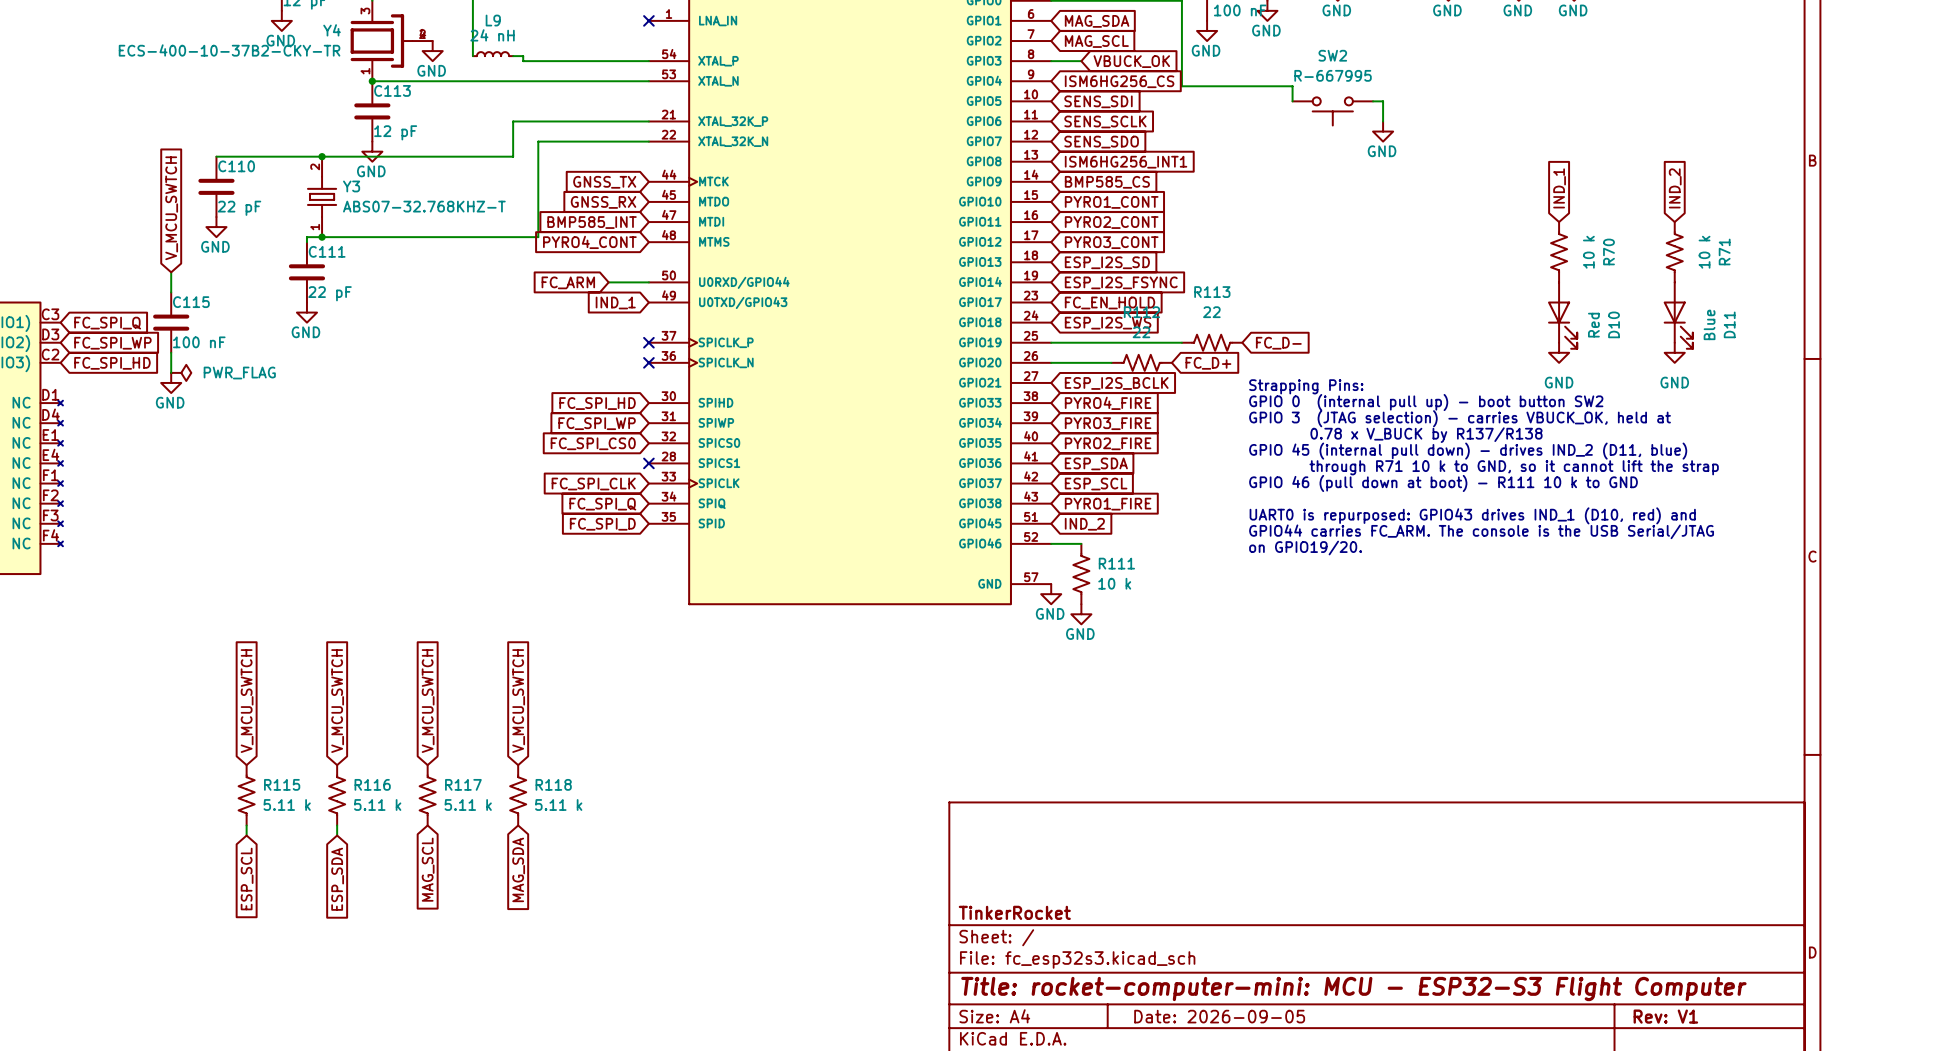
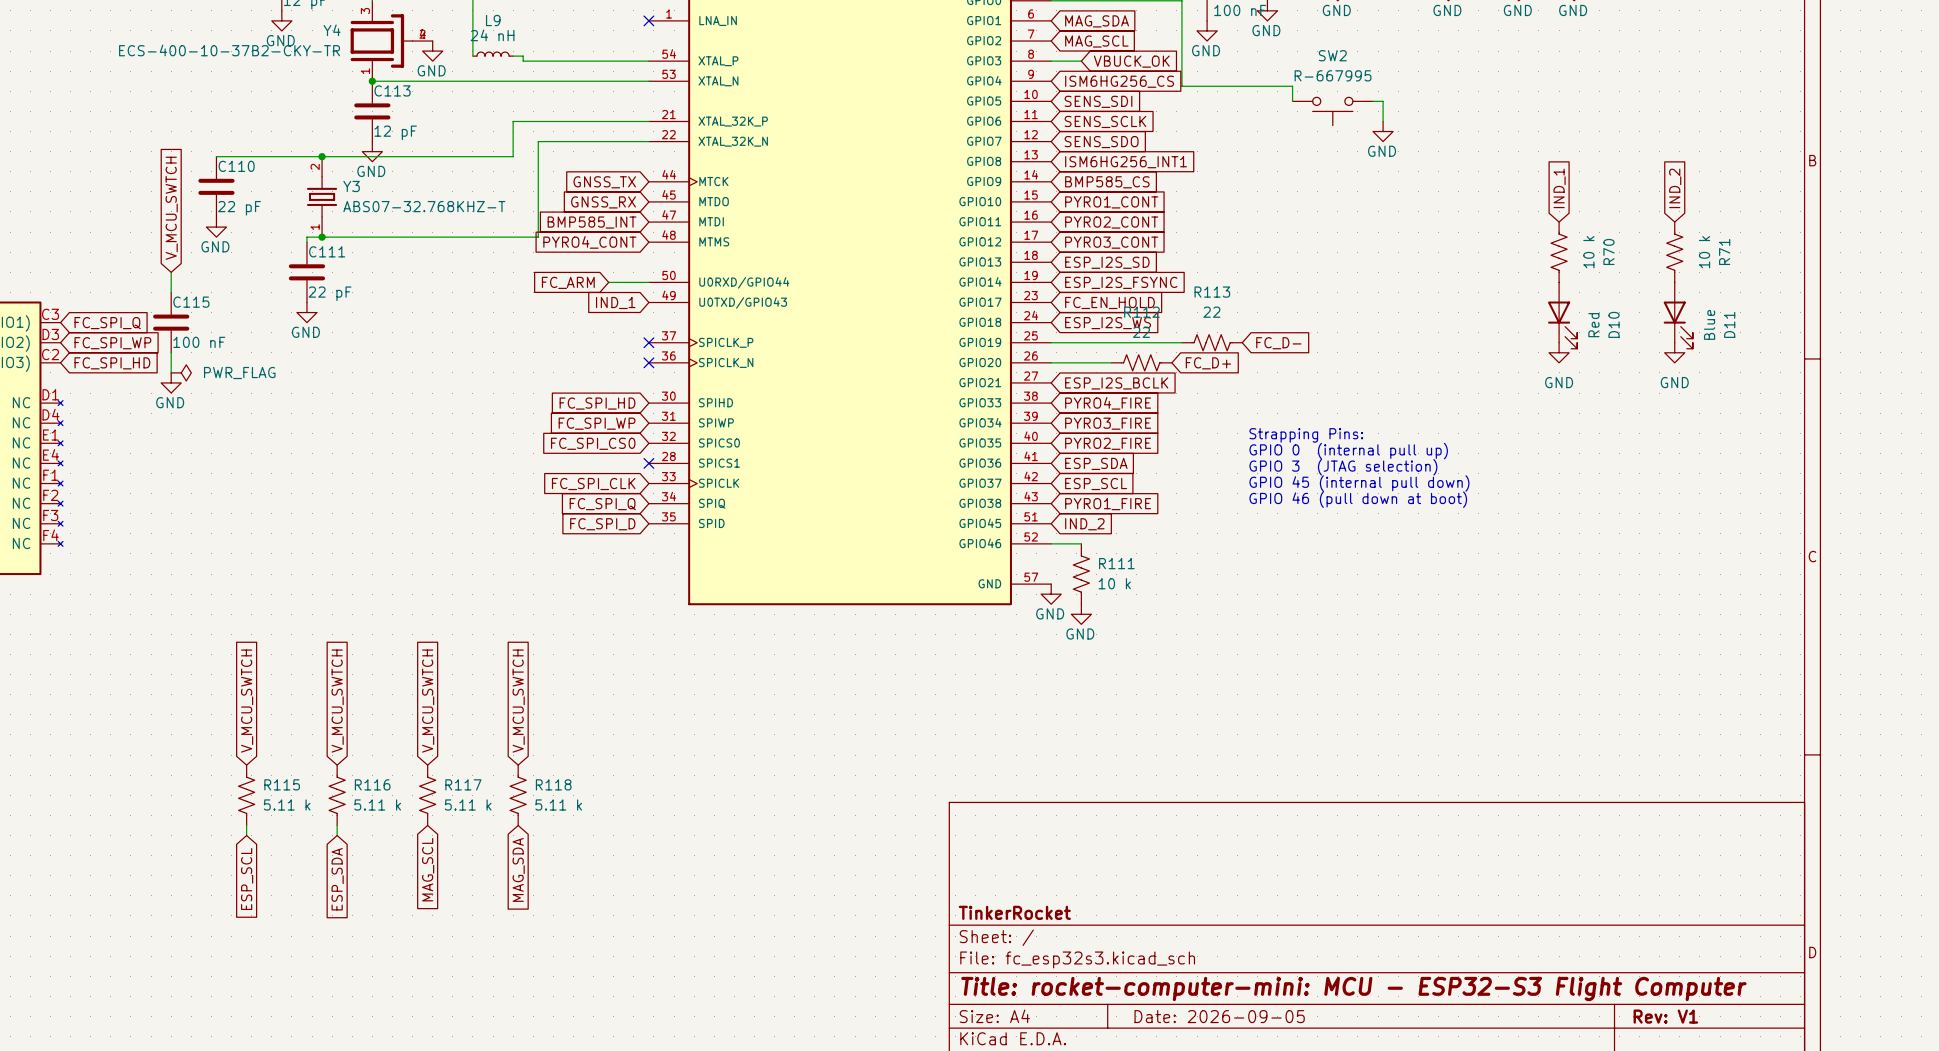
text: Strapping Pins: (1306, 386) -> none
text: GPIO 0 (internal pull up) - boot button SW2 (1426, 402) -> none
text: GPIO 3 (JTAG selection) - carries VBUCK_OK, held at (1460, 418) -> none
text: 0.78 x V_BUCK by R137/R138 (1426, 435) -> Strapping Pins: (1306, 435)
text: GPIO 45 (internal pull down) - drives IND_2 (D11, blue) (1468, 451) -> GPIO 0 (internal pull up) (1348, 451)
text: through R71 10 k to GND, so it cannot lift the strap (1514, 467) -> GPIO 3 (JTAG selection) (1343, 467)
text: GPIO 46 (pull down at boot) - R111 10 k to GND (1443, 483) -> GPIO 45 (internal pull down) (1359, 483)
text: none -> GPIO 46 (pull down at boot) (1358, 499)
text: UART0 is repurposed: GPIO43 drives IND_1 (D10, red) and (1472, 515) -> none
text: GPIO44 carries FC_ARM. The console is the USB Serial/JTAG (1481, 531) -> none
text: on GPIO19/20. (1305, 548) -> none

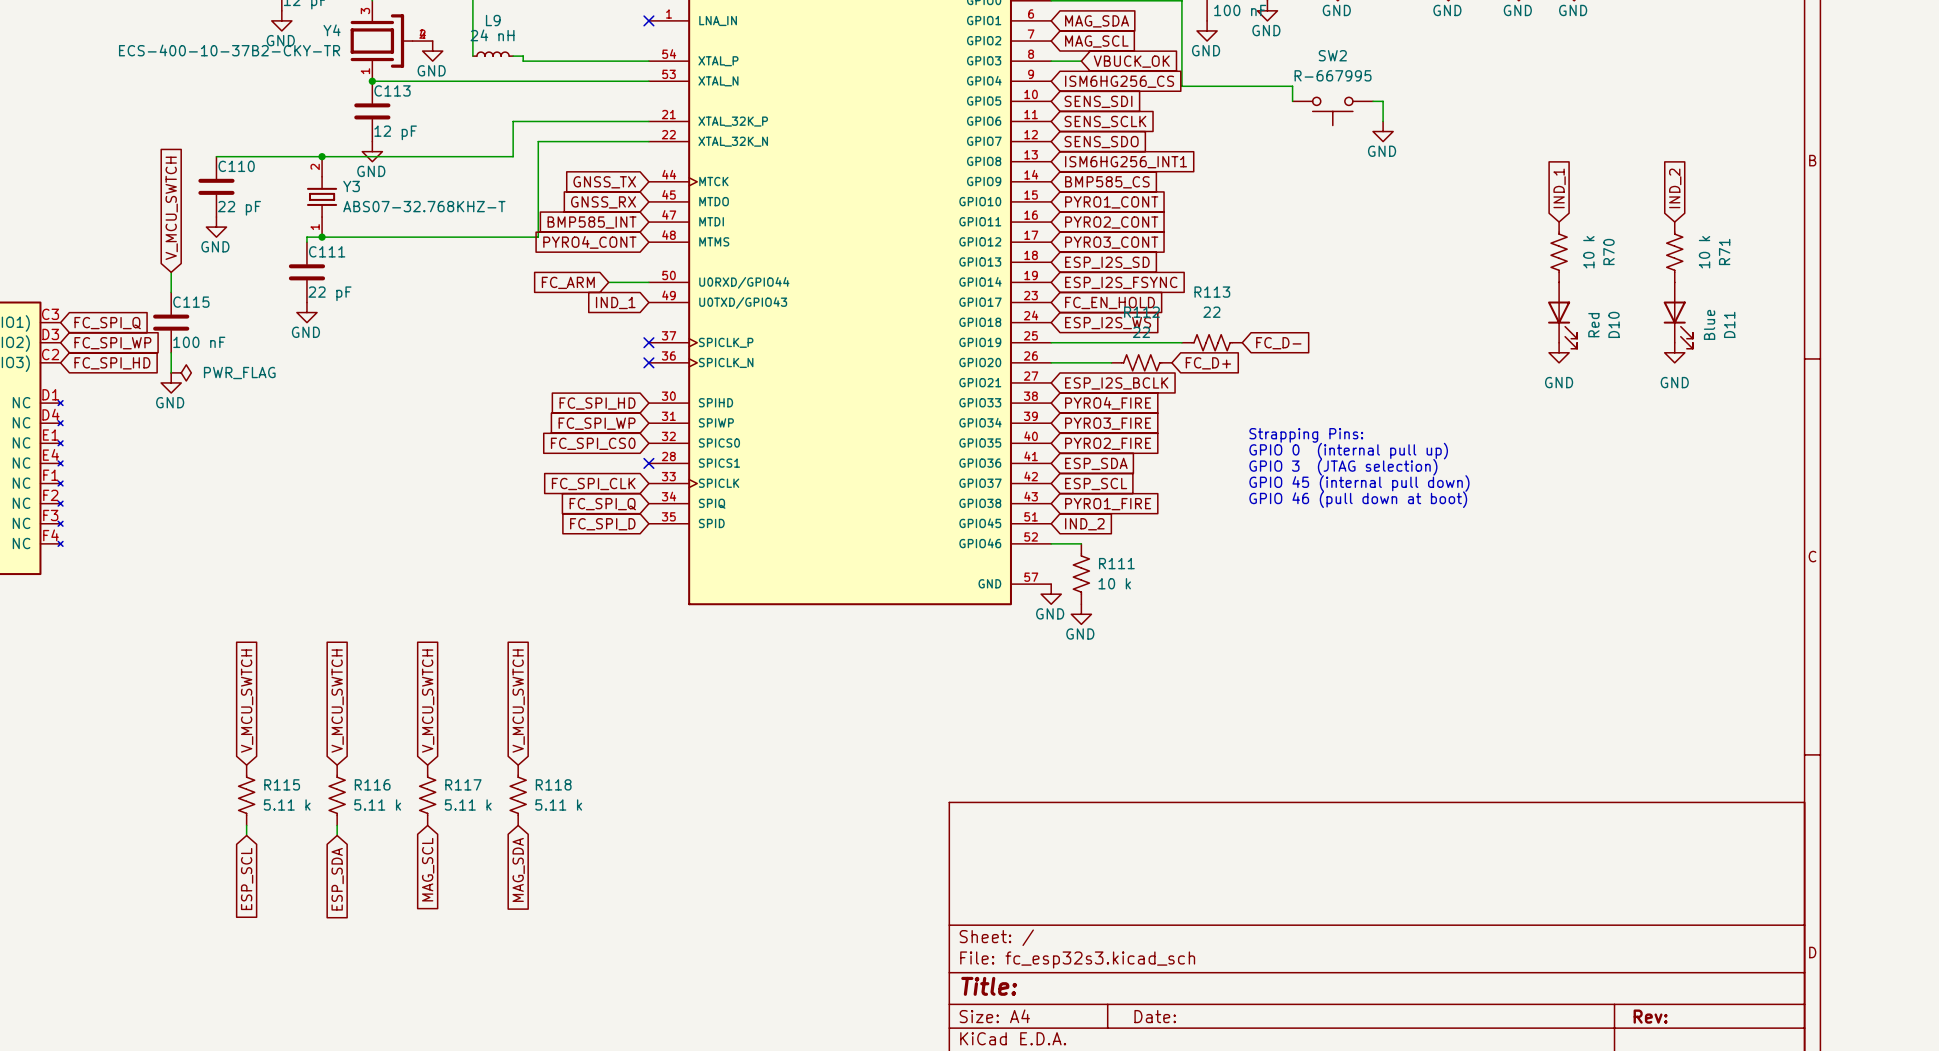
title block: TinkerRocket (1014, 912) -> none
title block: Title: rocket-computer-mini: MCU - ESP32-S3 Flight Computer (1353, 988) -> Title: (989, 986)
title block: Date: 2026-09-05 (1219, 1016) -> Date: (1155, 1016)
title block: Rev: V1 (1665, 1016) -> Rev: (1650, 1016)

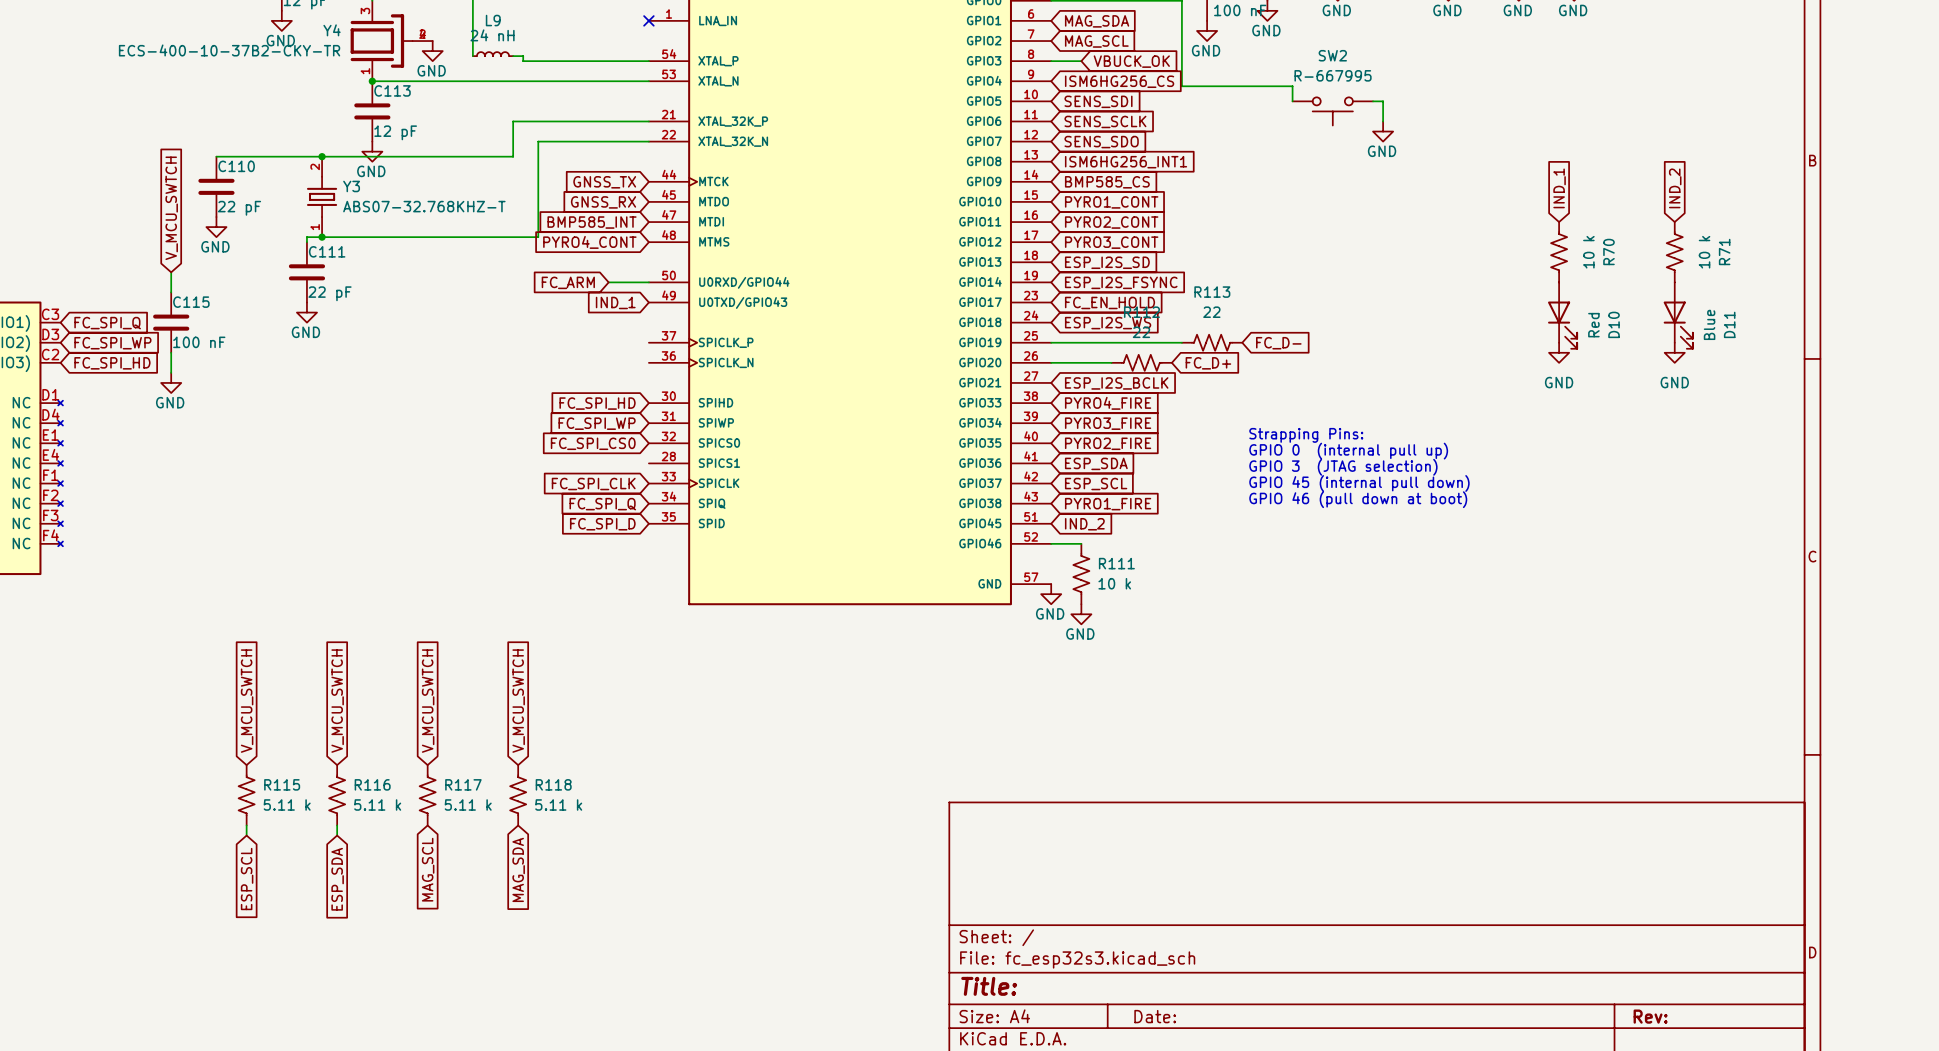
no-connect mark: (648, 342) -> none
no-connect mark: (648, 362) -> none
power symbol: PWR_FLAG (181, 372) -> none
no-connect mark: (648, 463) -> none

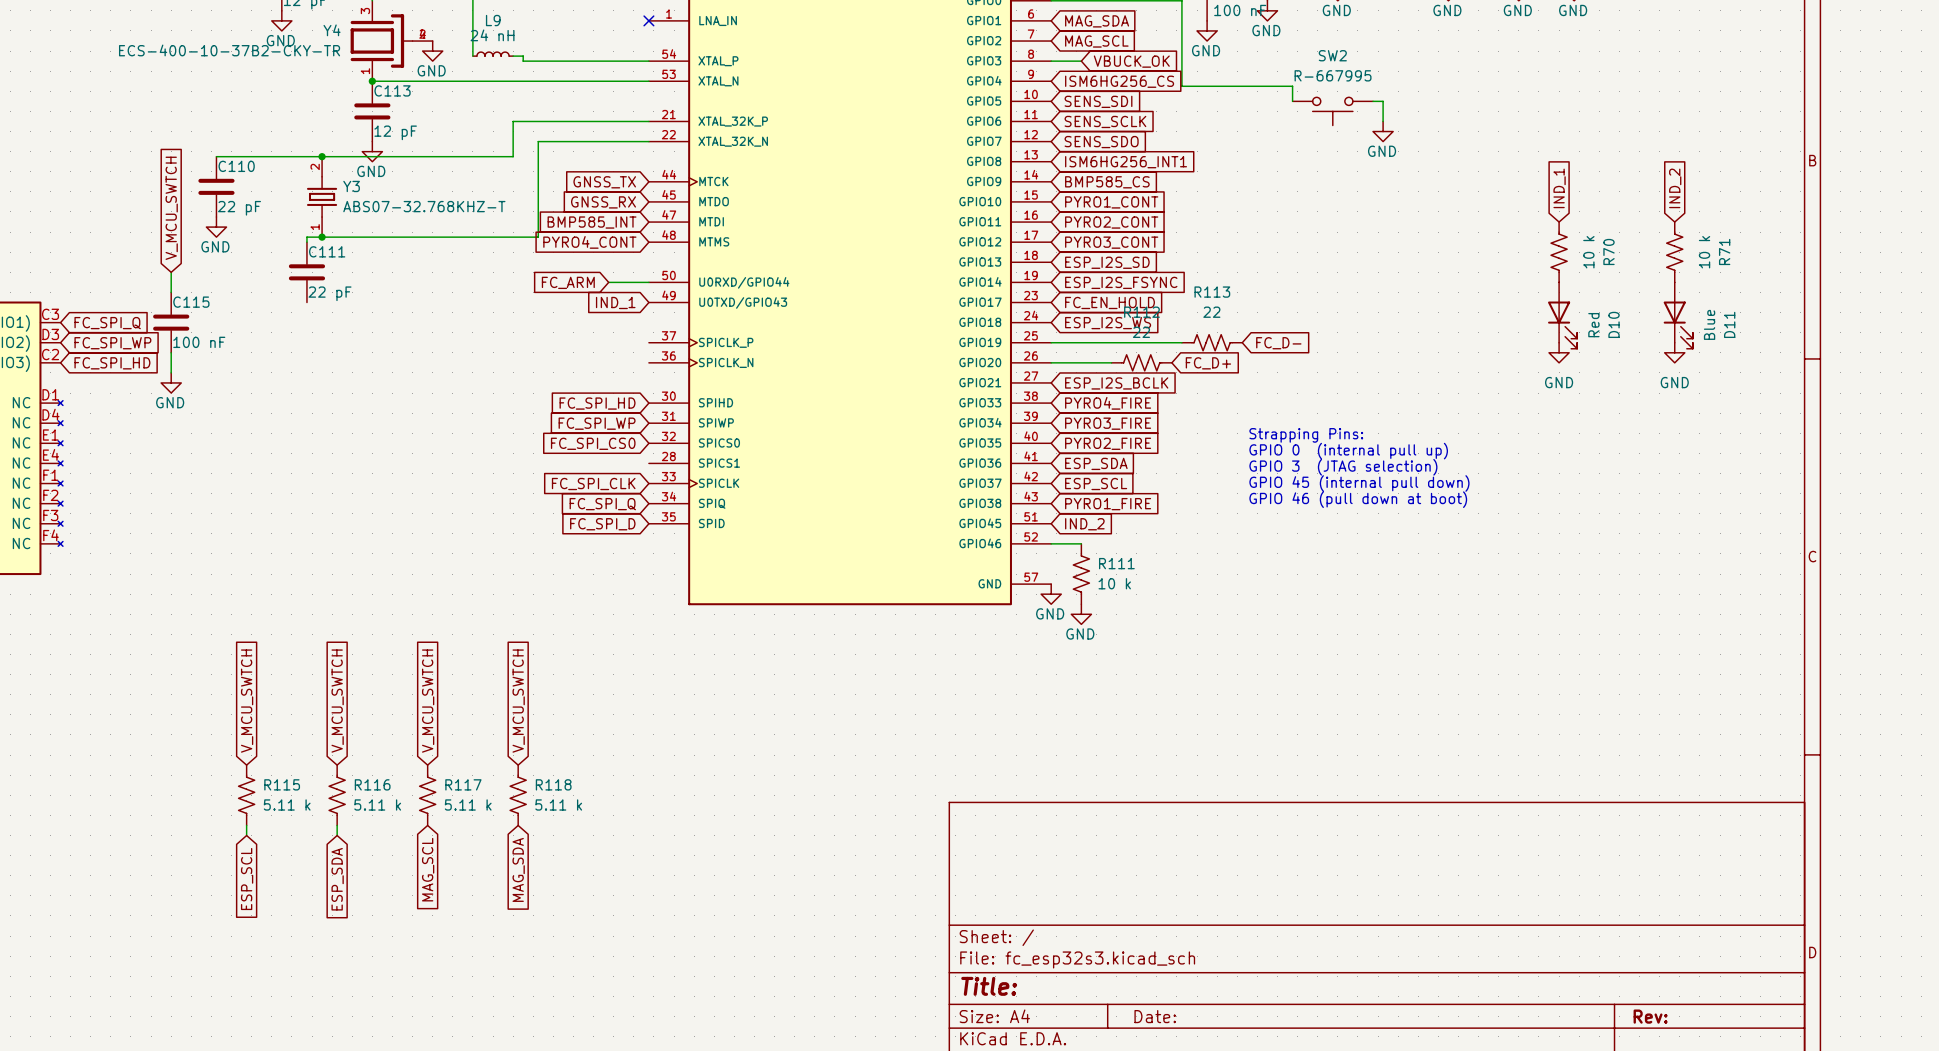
power symbol: GND (306, 312) -> none

